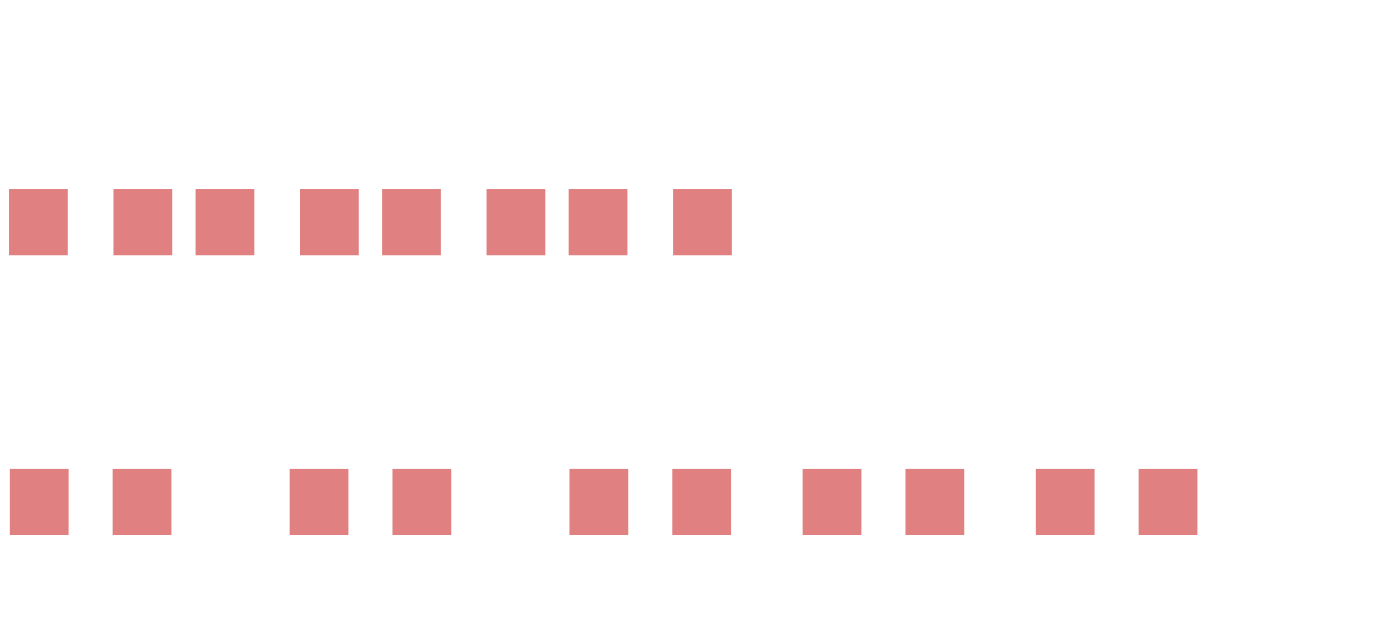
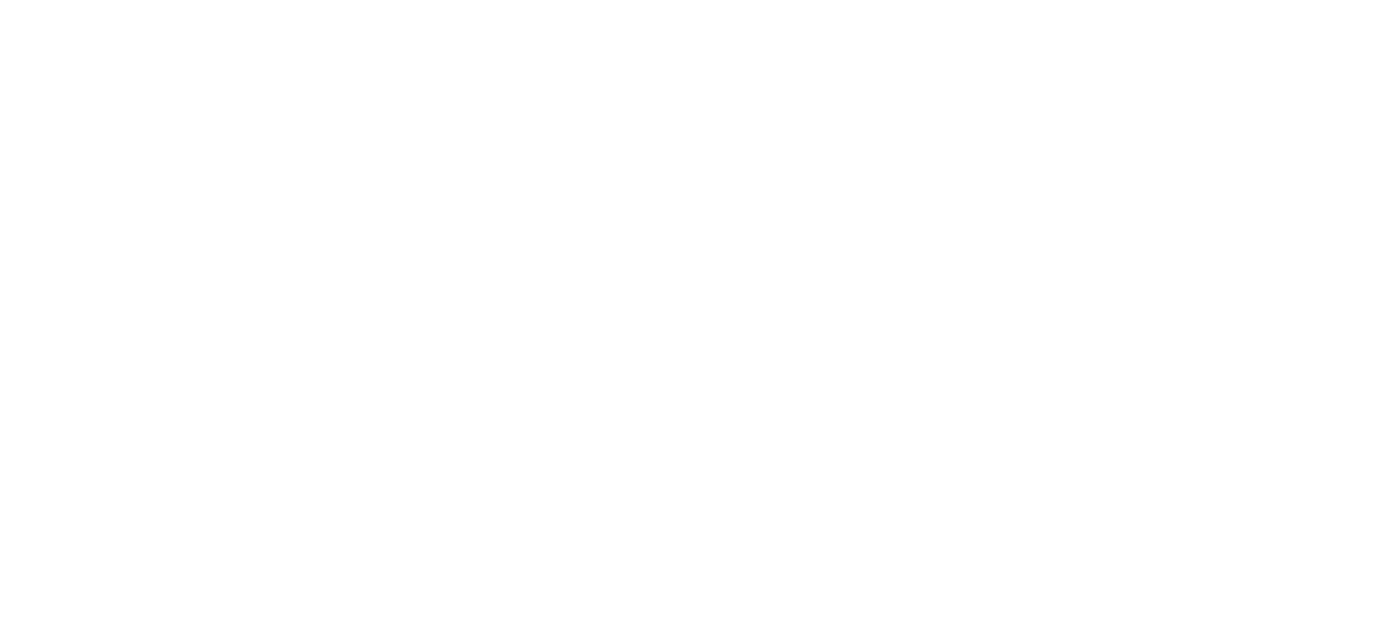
part: (90, 222) -> none
part: (277, 222) -> none
part: (463, 222) -> none
part: (650, 222) -> none
part: (90, 501) -> none
part: (370, 501) -> none
part: (650, 501) -> none
part: (883, 501) -> none
part: (1116, 501) -> none

